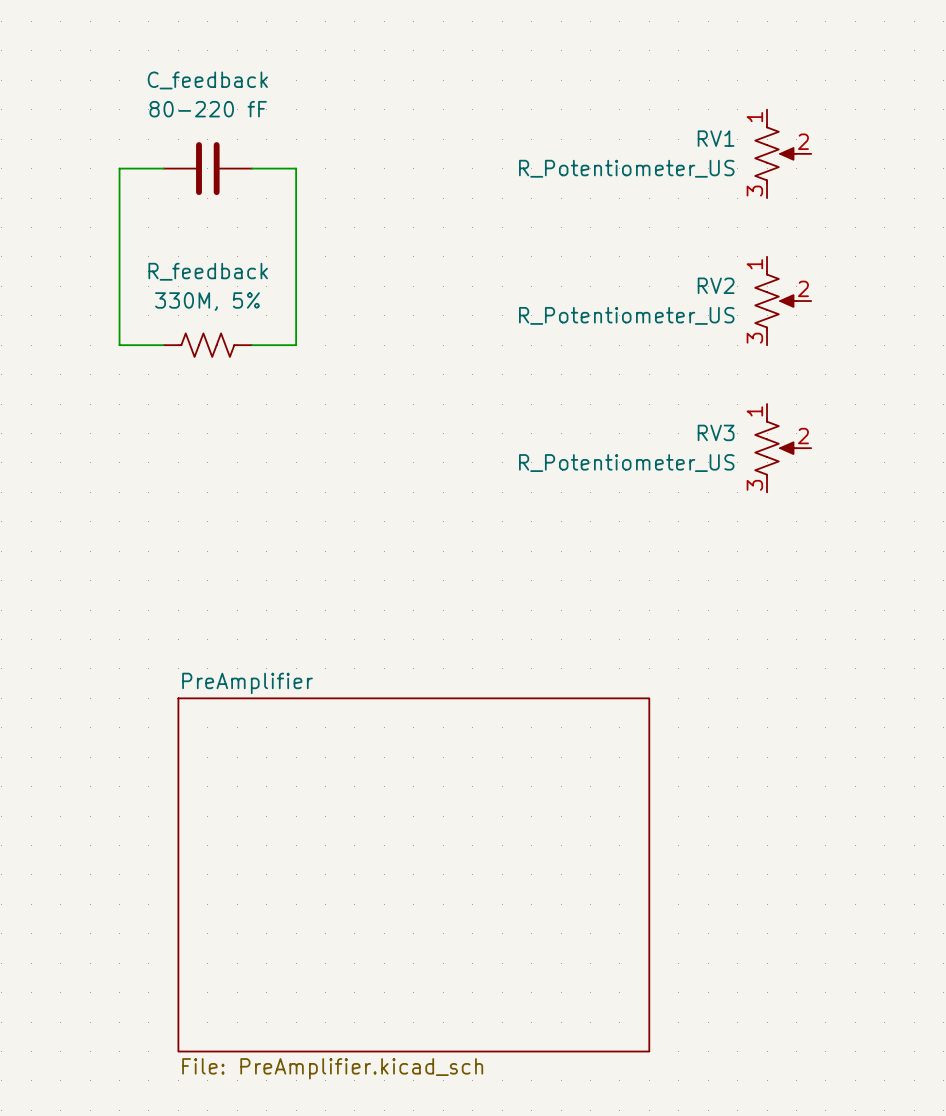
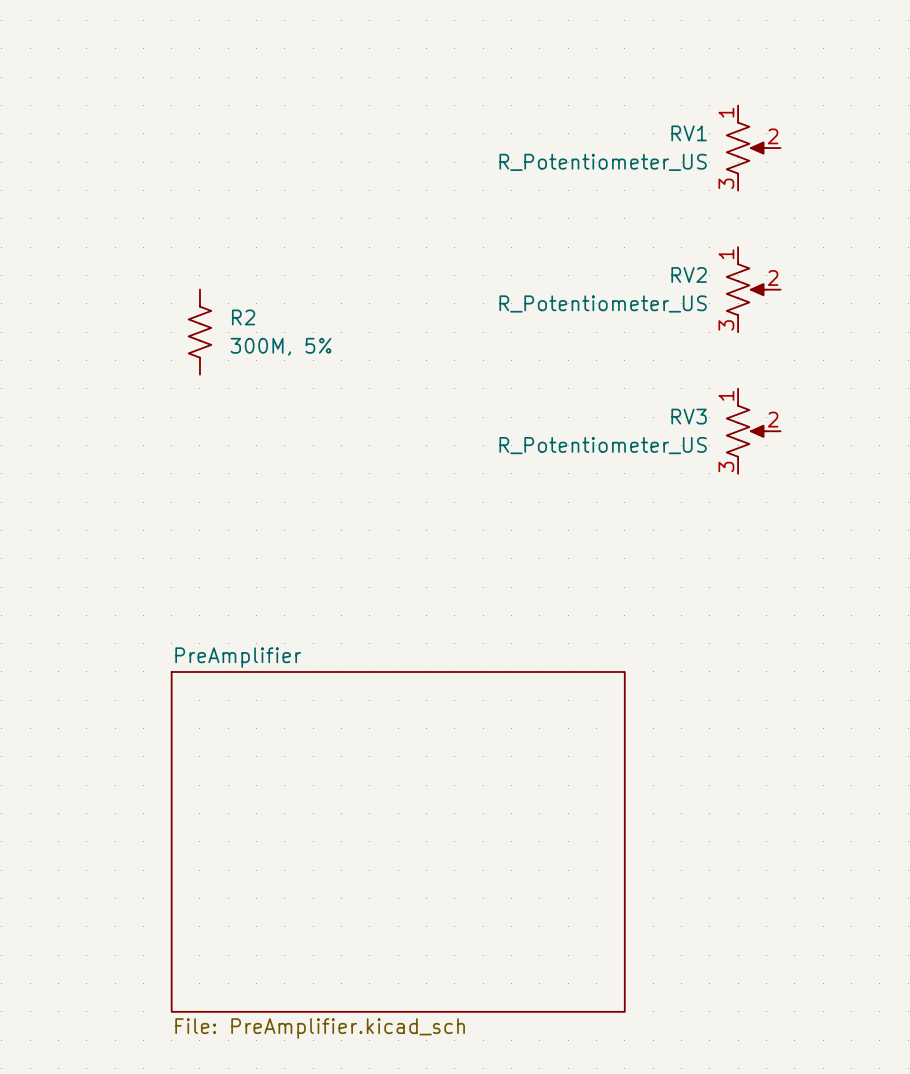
wire: (163, 168) (119, 168) (119, 345) (163, 345) -> none
C_feedback: 80-220 fF (207, 168) -> none
wire: (251, 168) (296, 168) (296, 345) (251, 345) -> none
R_feedback: 330M, 5% (207, 345) -> none
R2: none -> 300M, 5% (199, 332)

